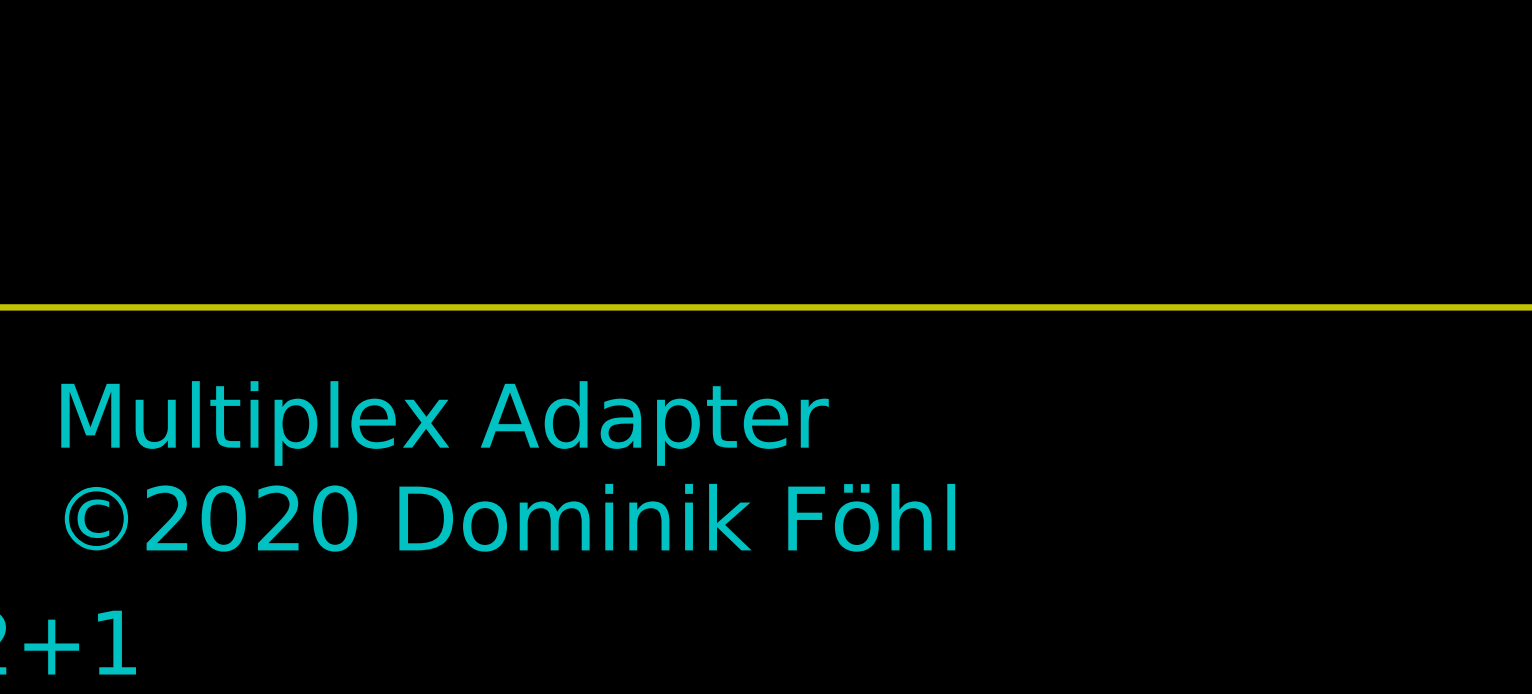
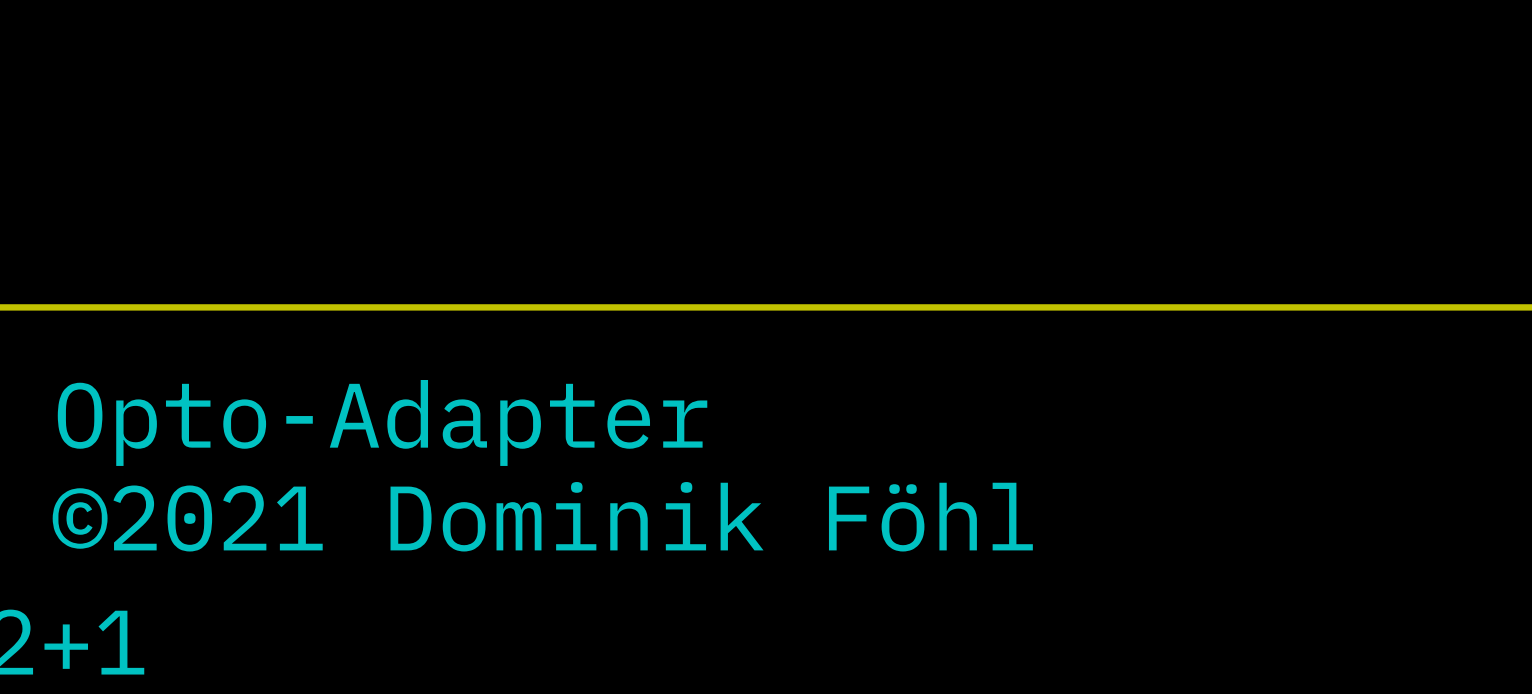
text: Multiplex Adapter (445, 423) -> Opto-Adapter (382, 422)
text: ©2020 Dominik Föhl (509, 517) -> ©2021 Dominik Föhl (542, 516)

